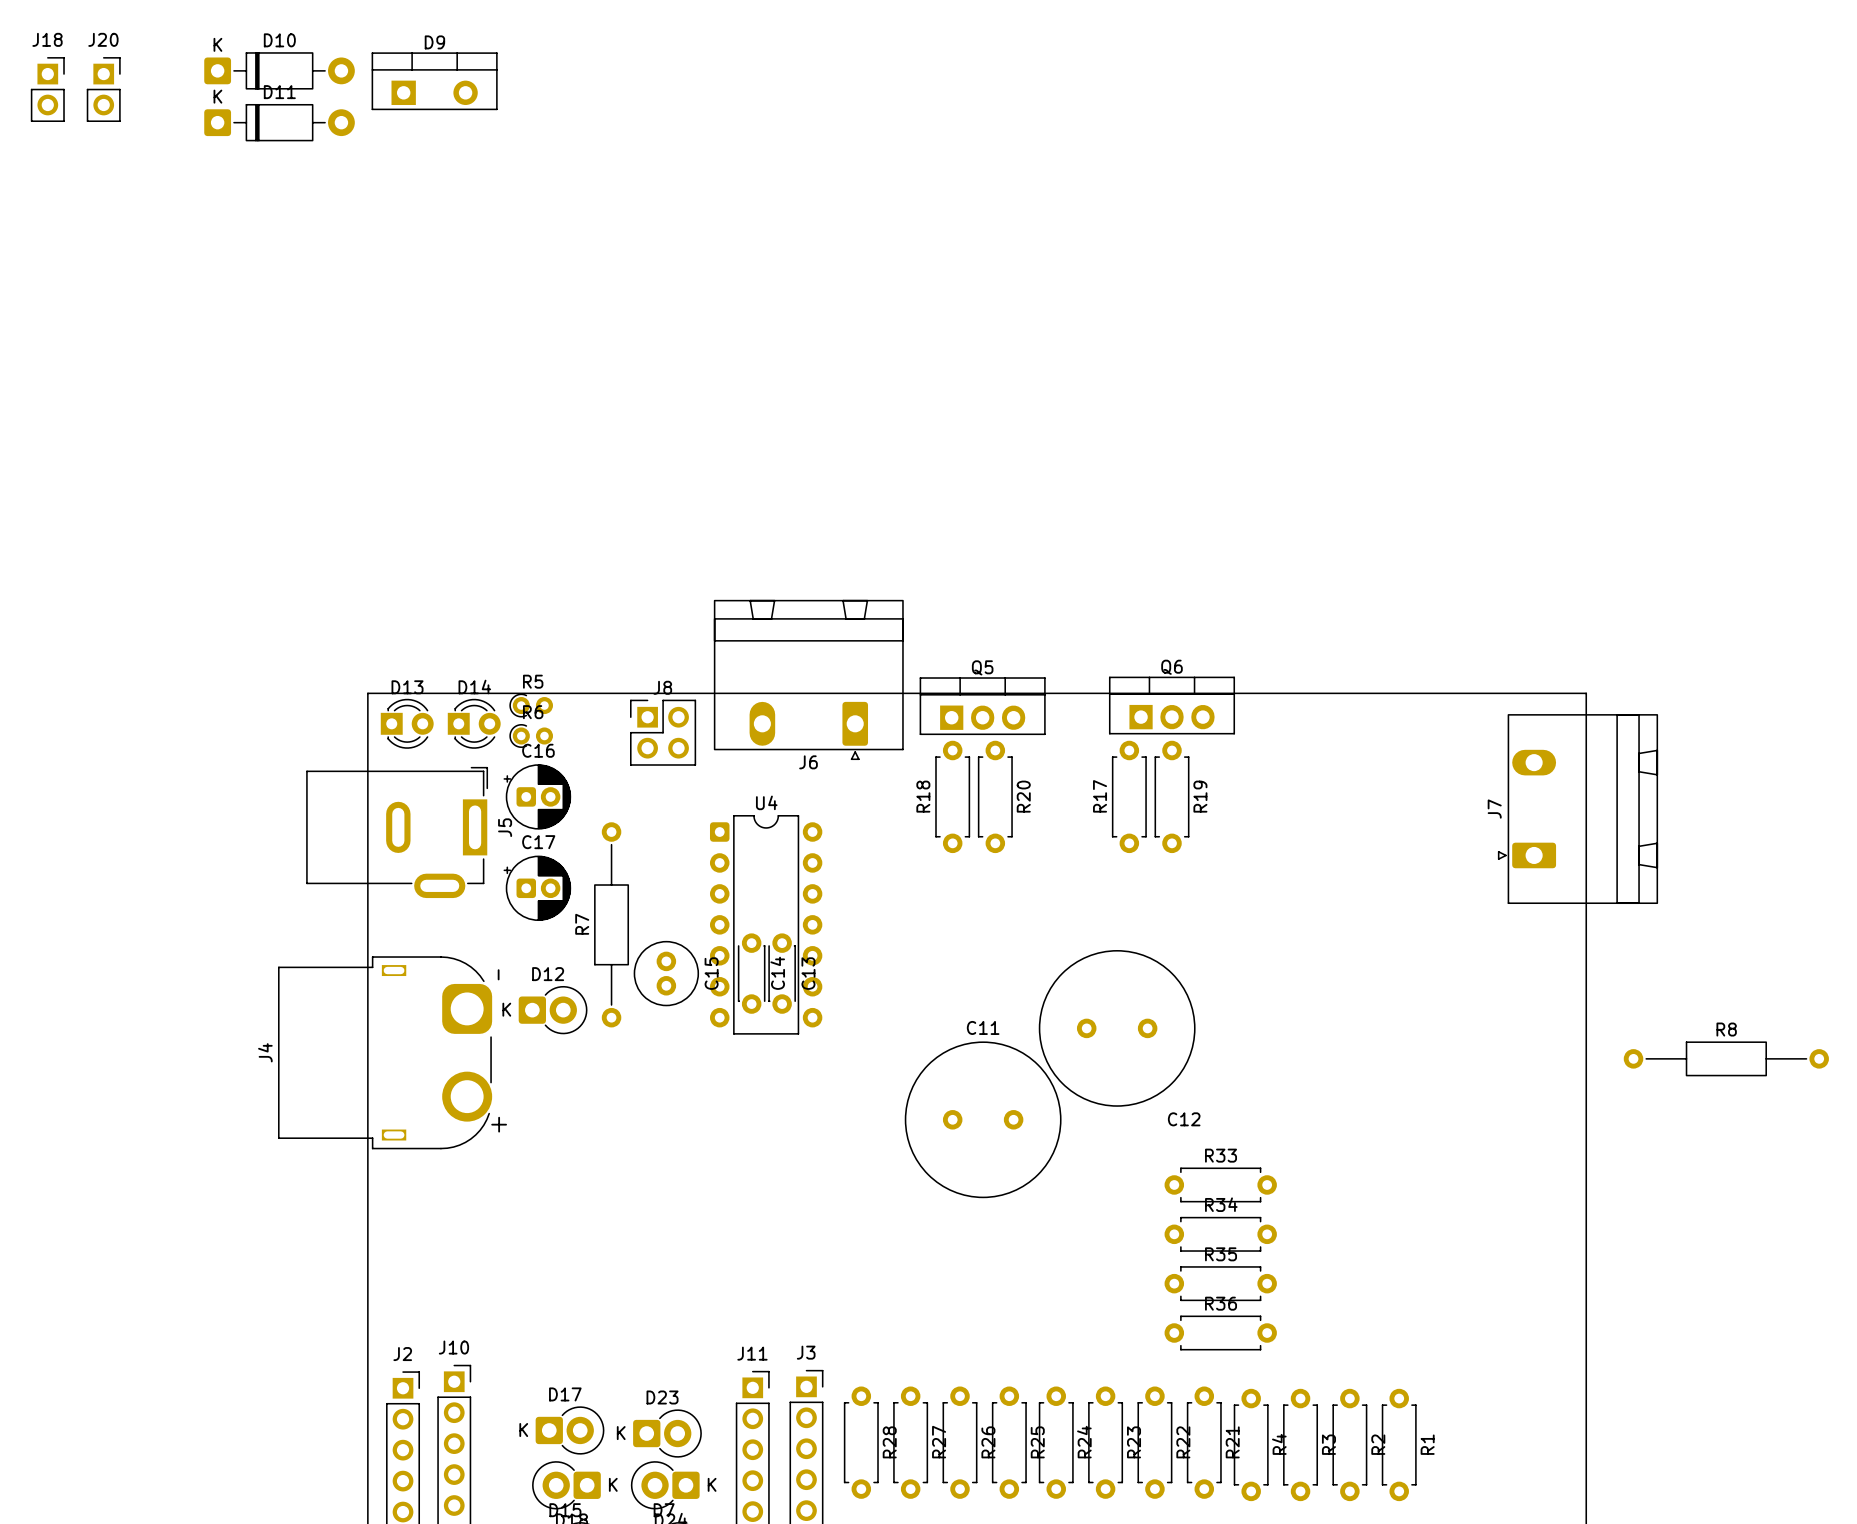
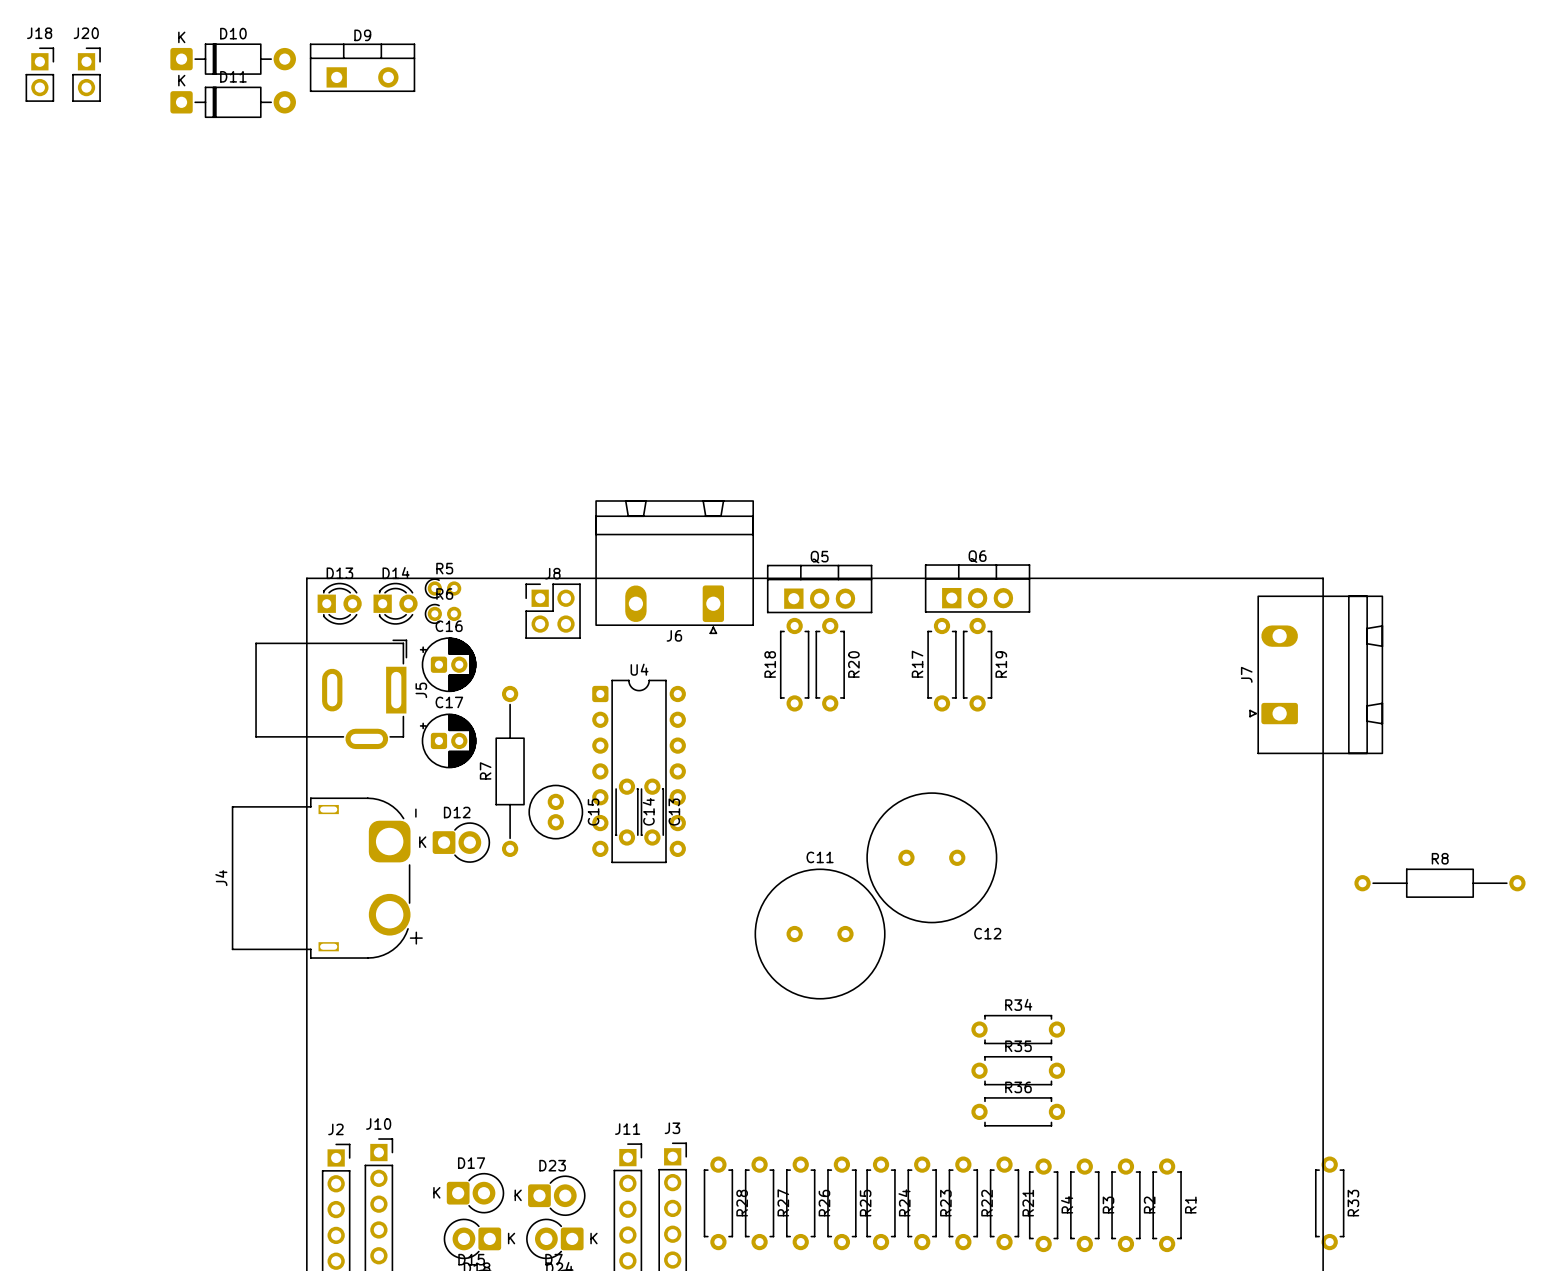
R33 rotation: 0° (1220, 1184) -> 90° clockwise (1329, 1203)
R33 position: (1220, 1184) -> (1329, 1203)

